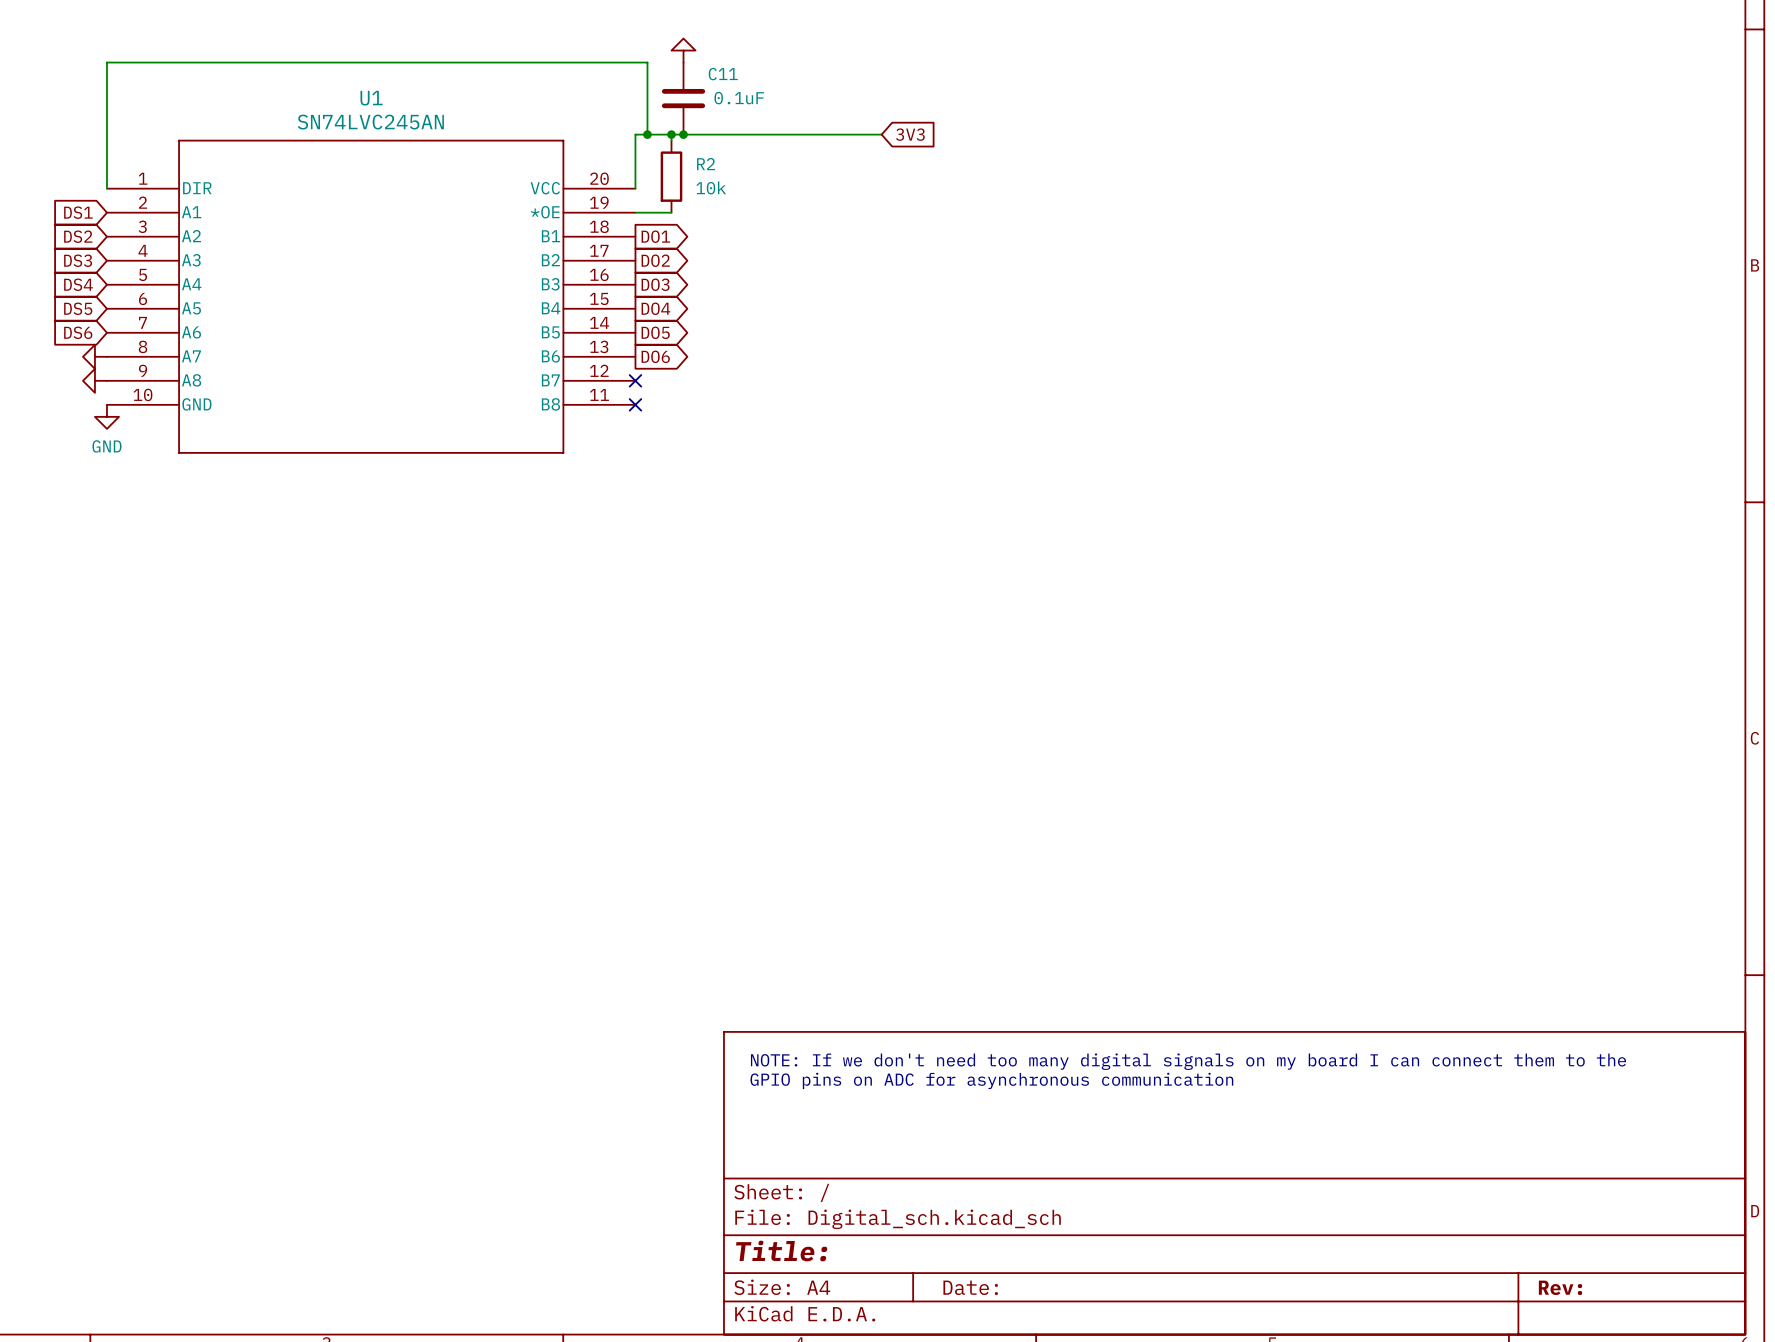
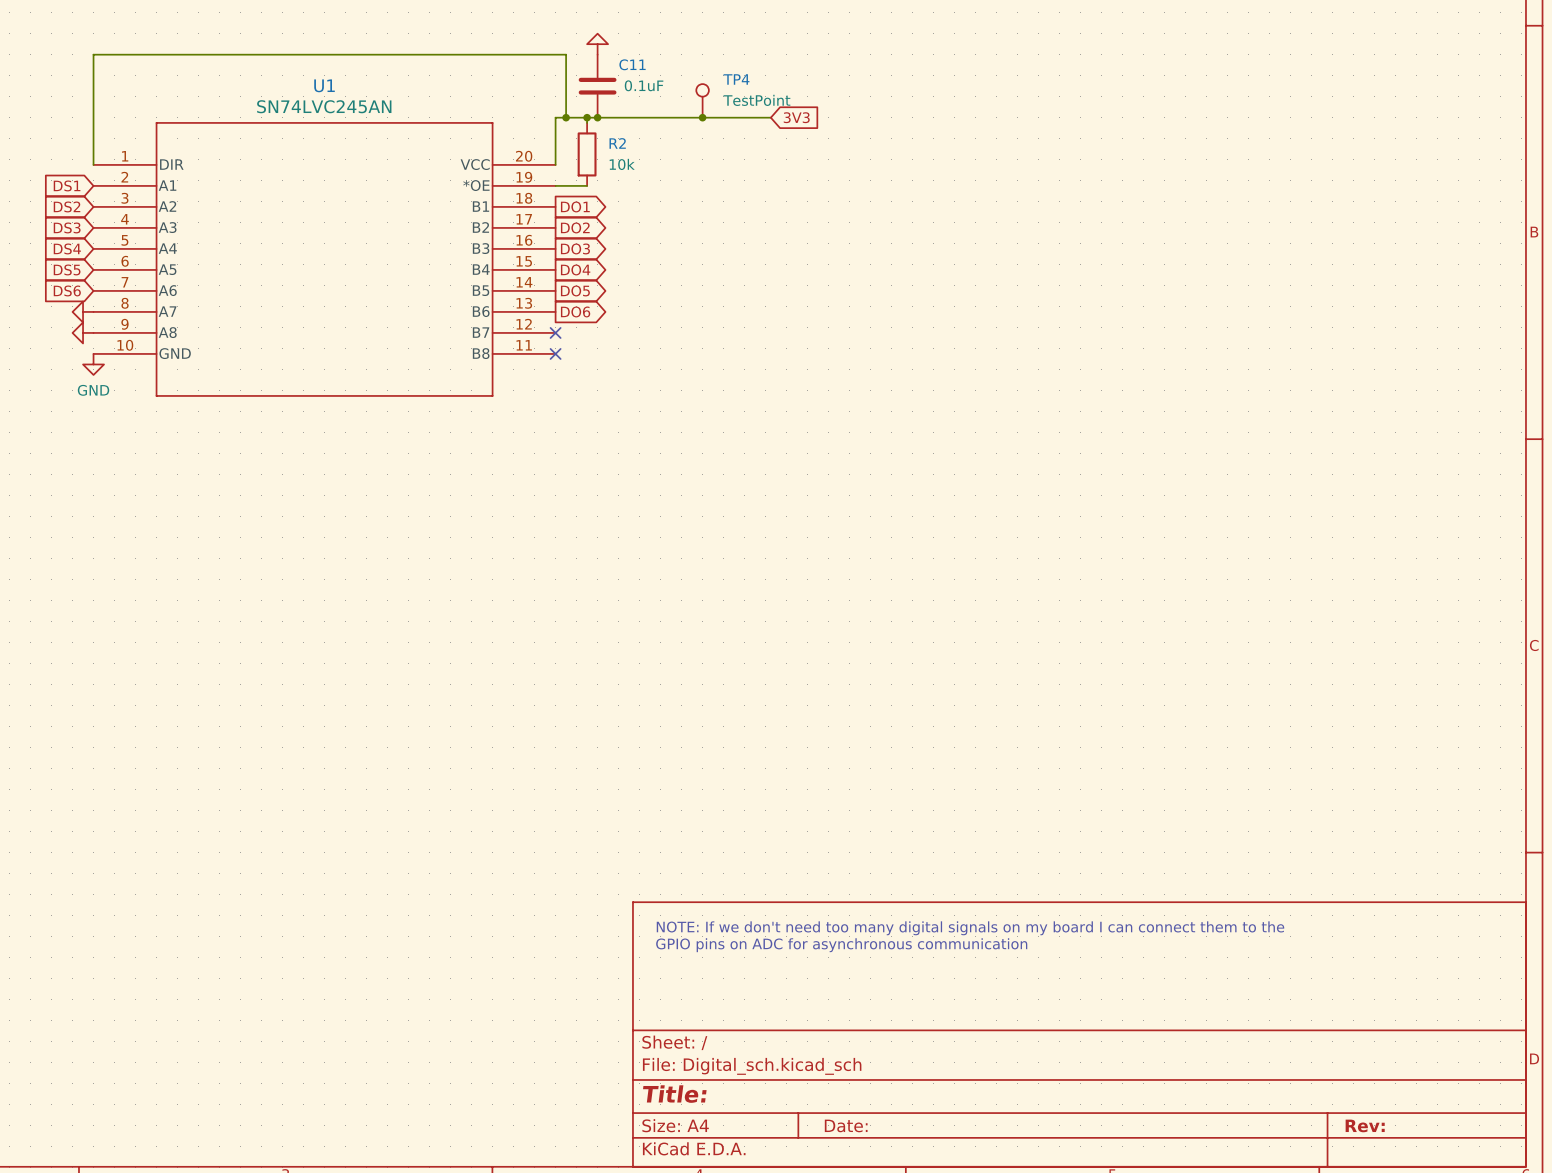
TP4: none -> TestPoint (702, 100)
junction: none -> (702, 117)

